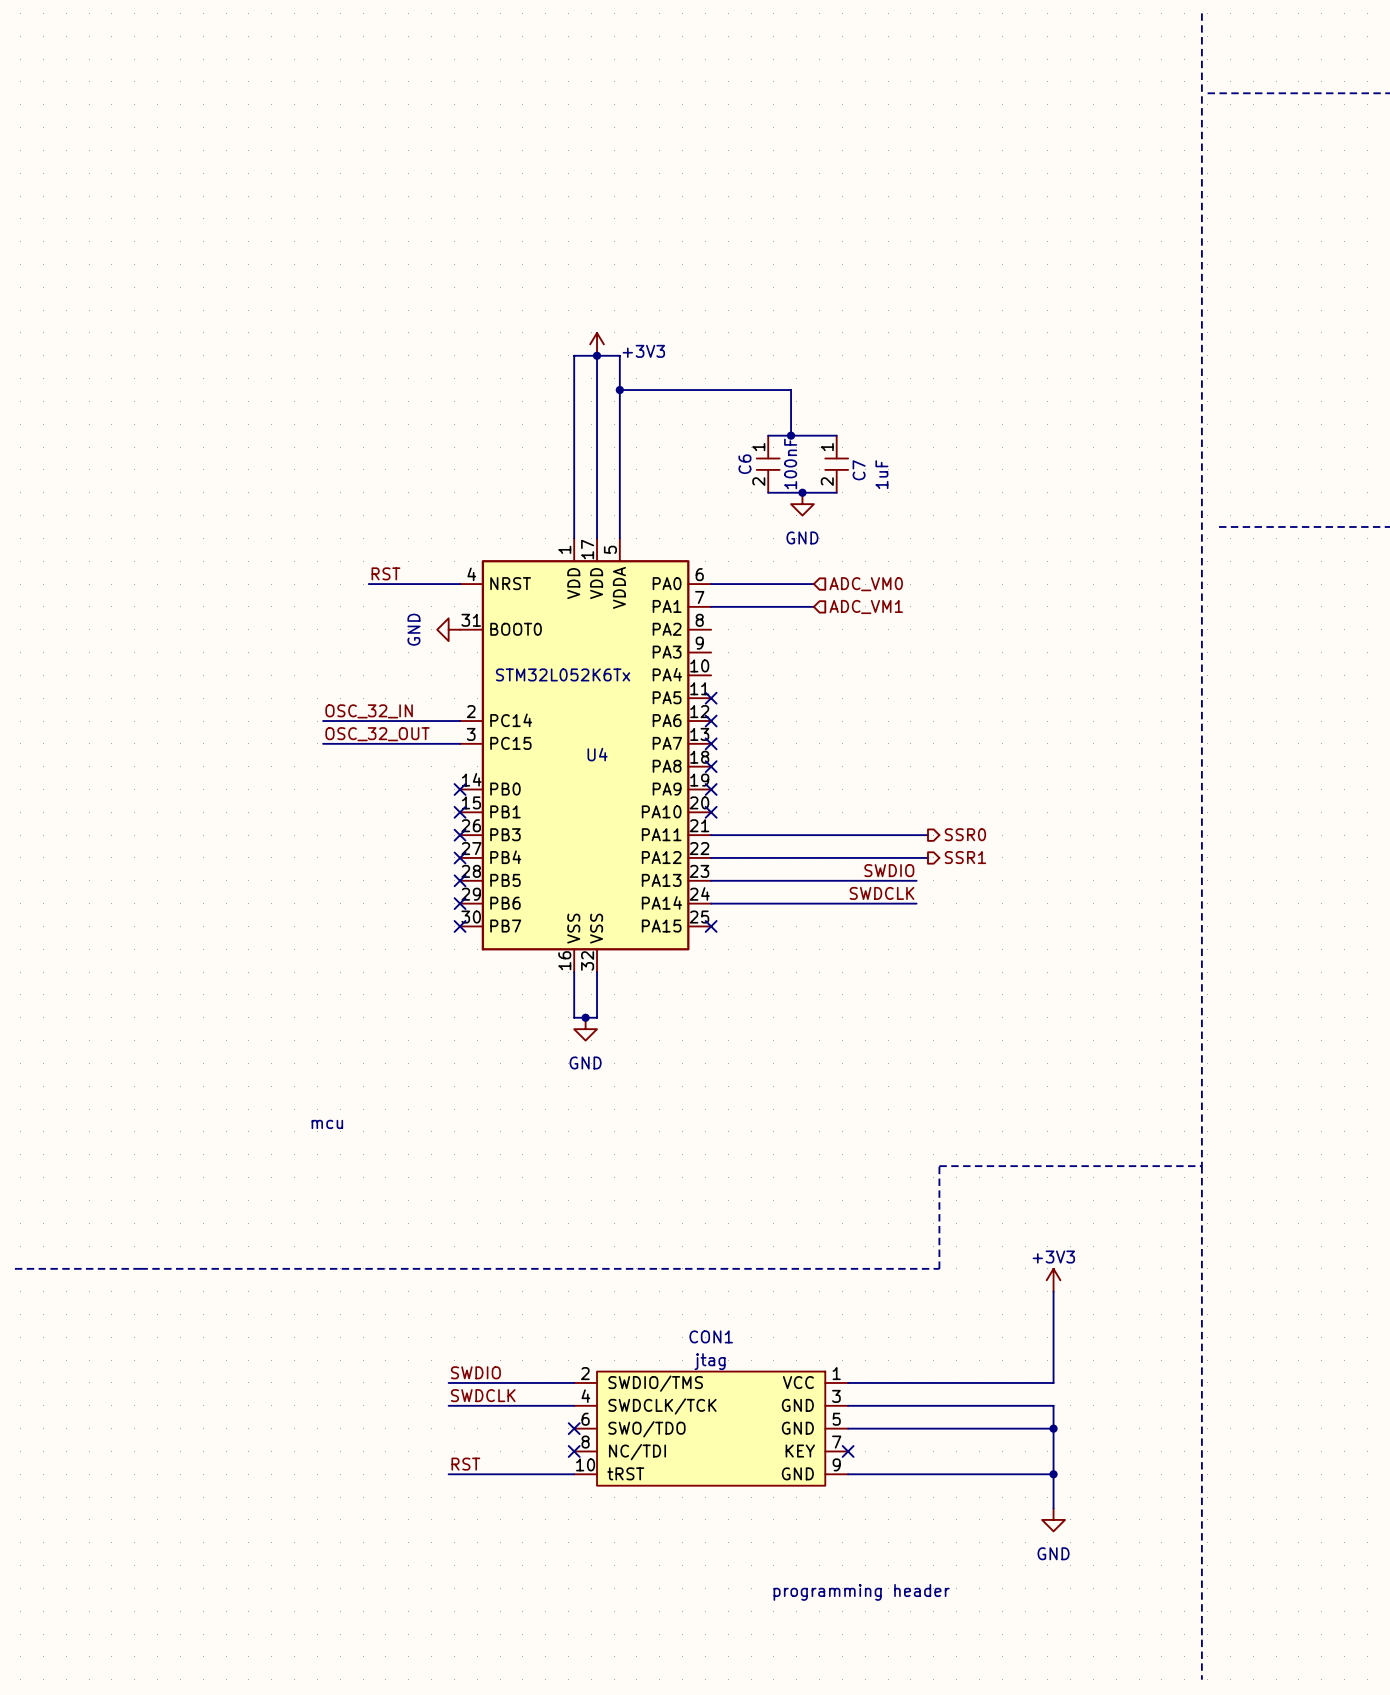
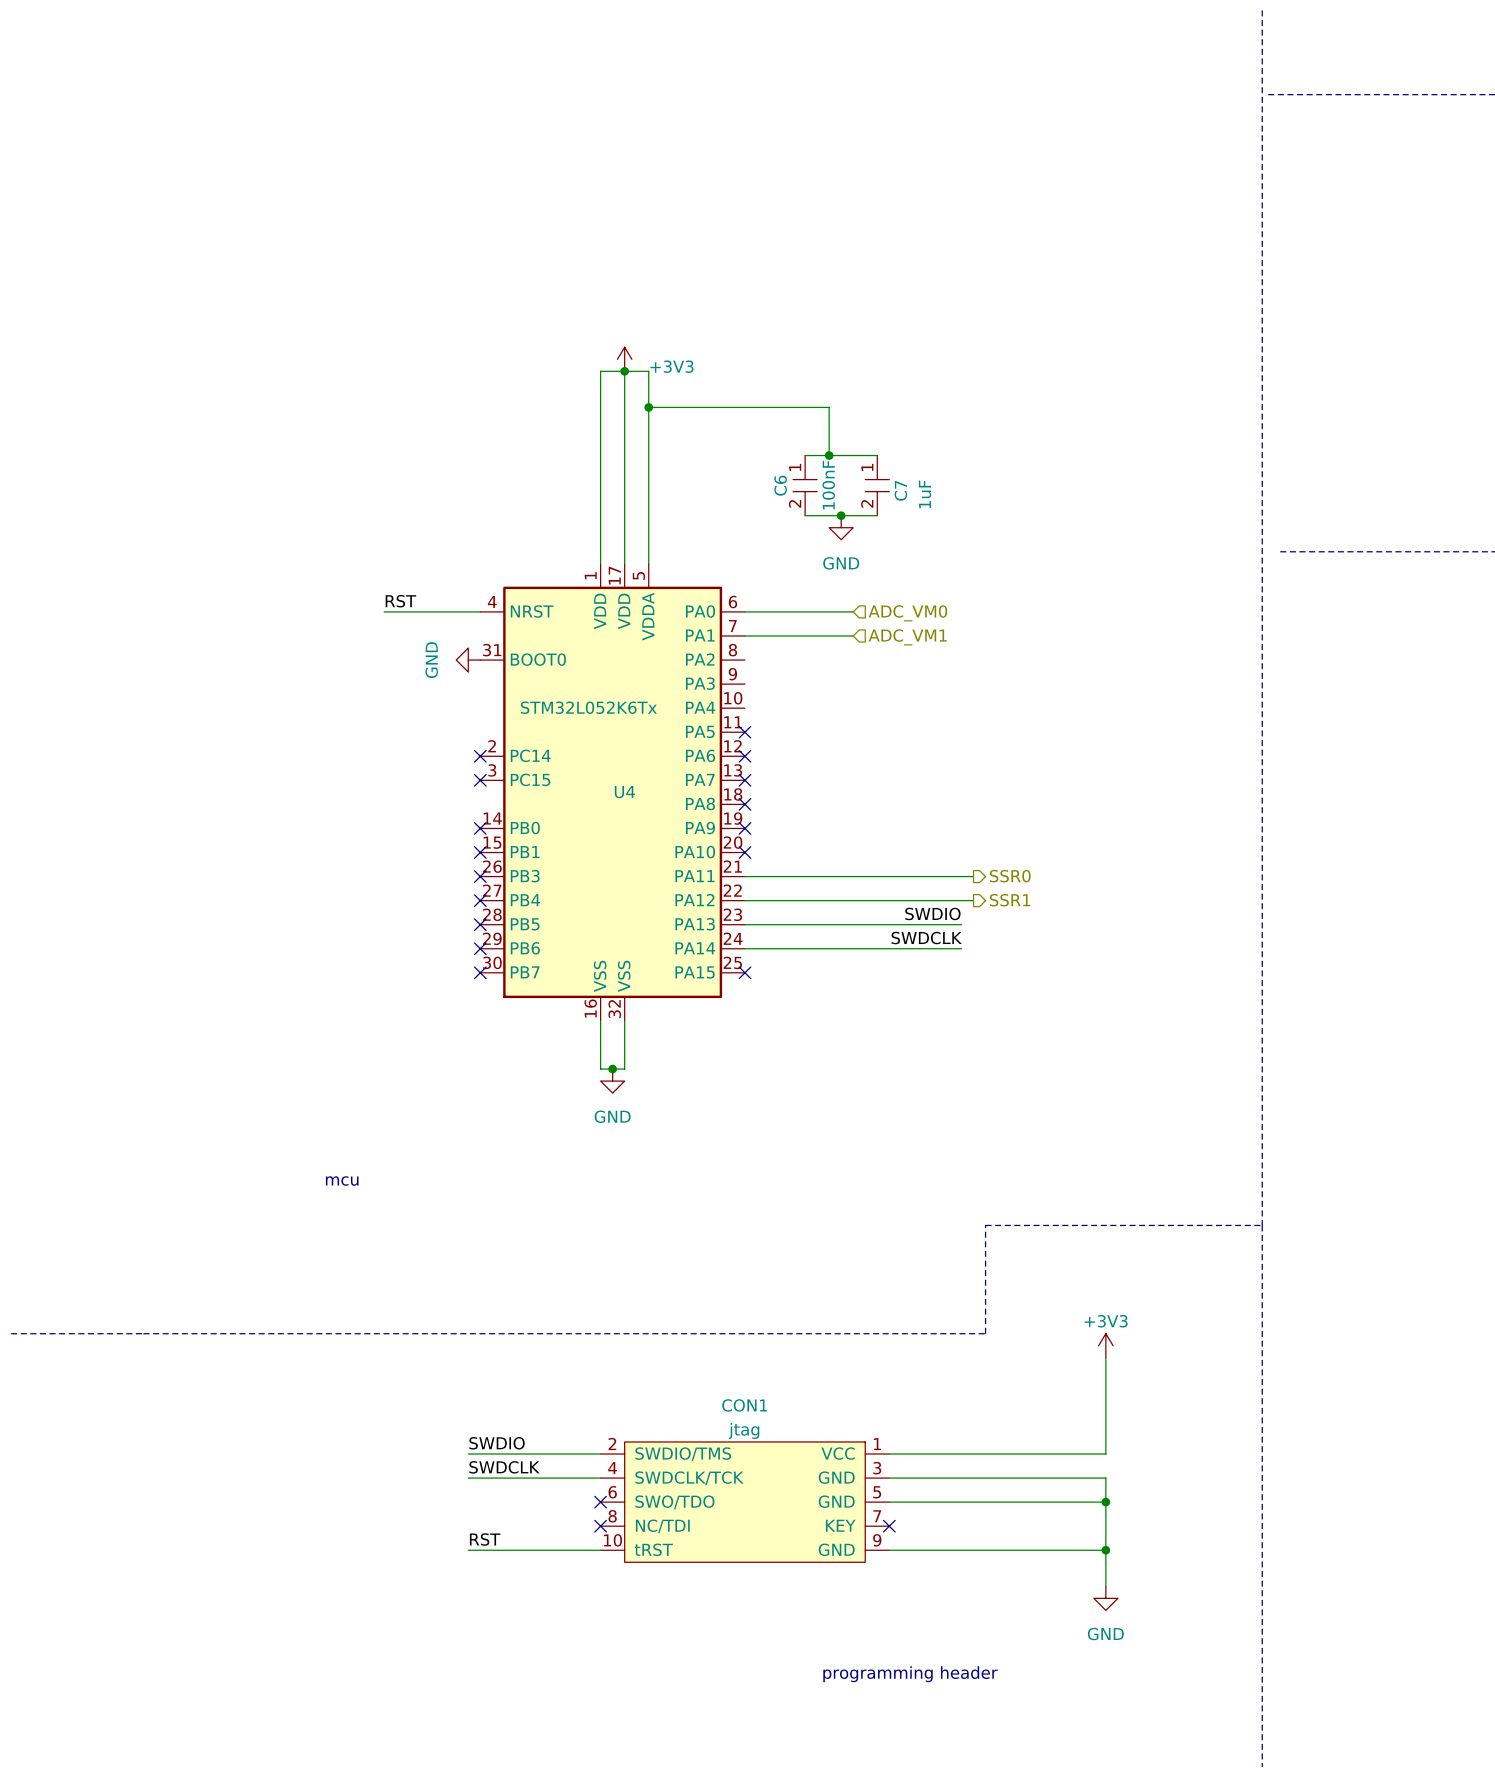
label: OSC_32_IN (369, 711) -> none
wire: (323, 721) (460, 721) -> none
no-connect mark: none -> (480, 756)
label: OSC_32_OUT (377, 734) -> none
wire: (323, 743) (460, 743) -> none
no-connect mark: none -> (480, 780)

